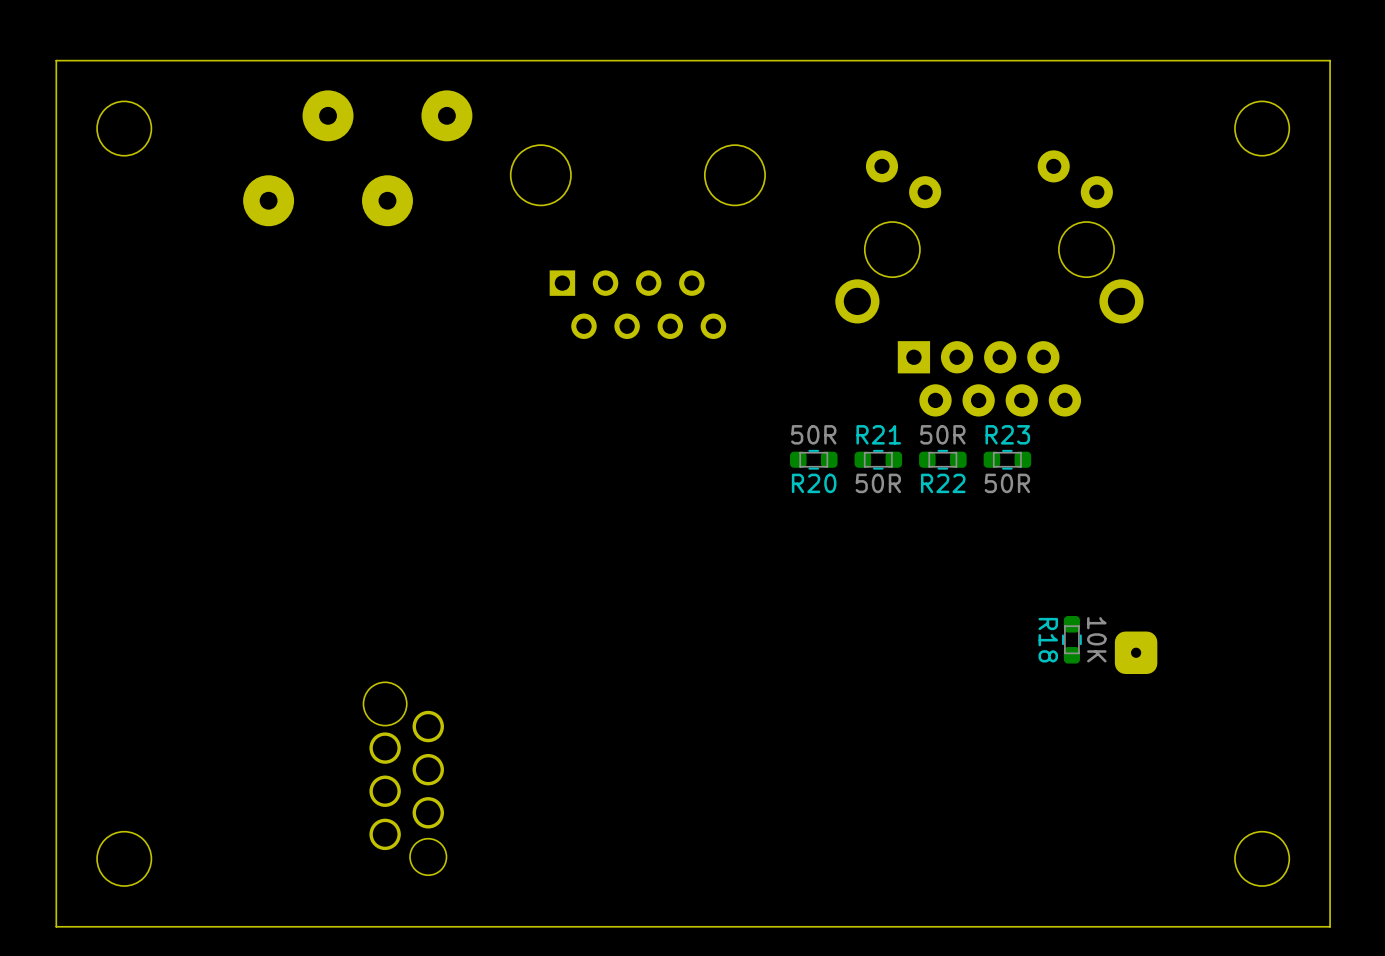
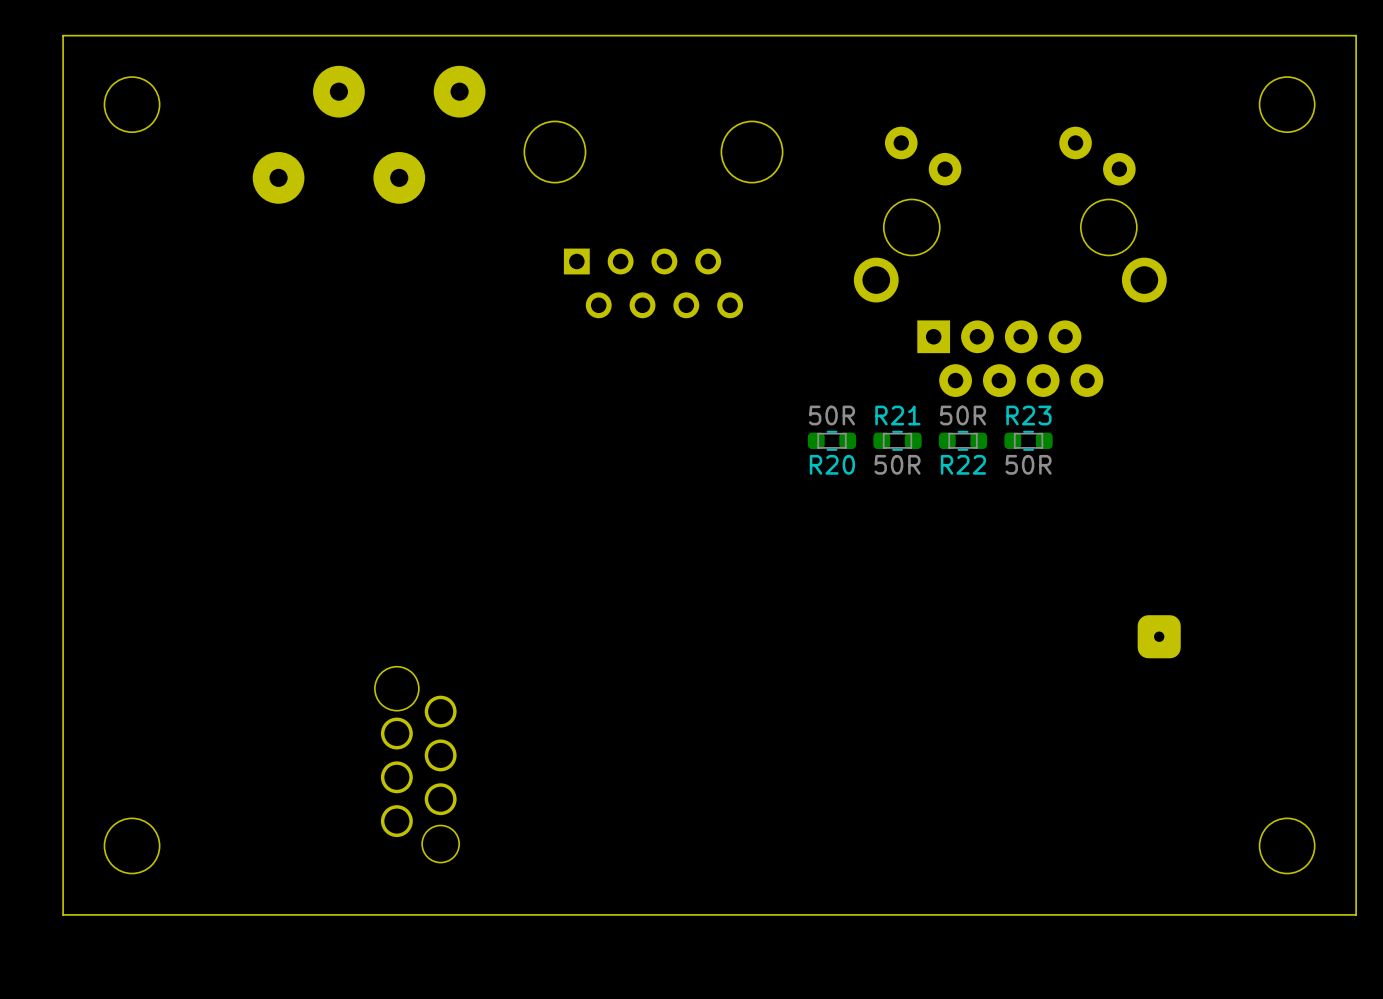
R18: 10K (1071, 639) -> none

